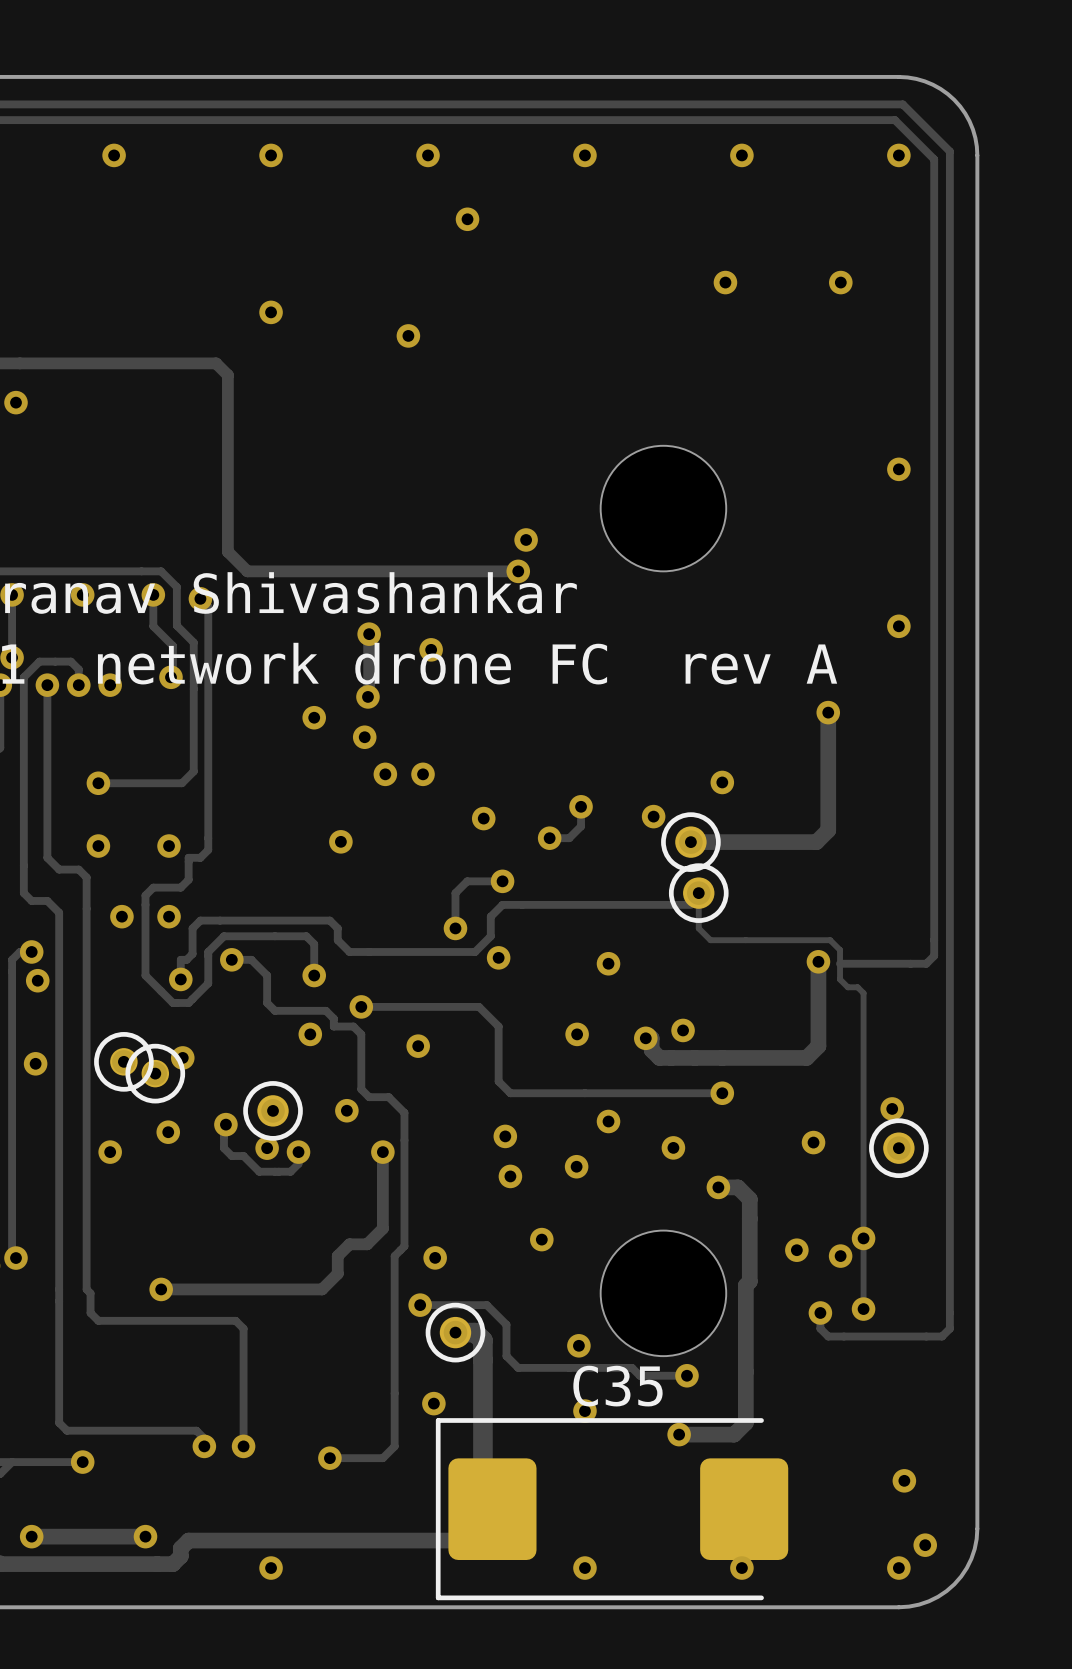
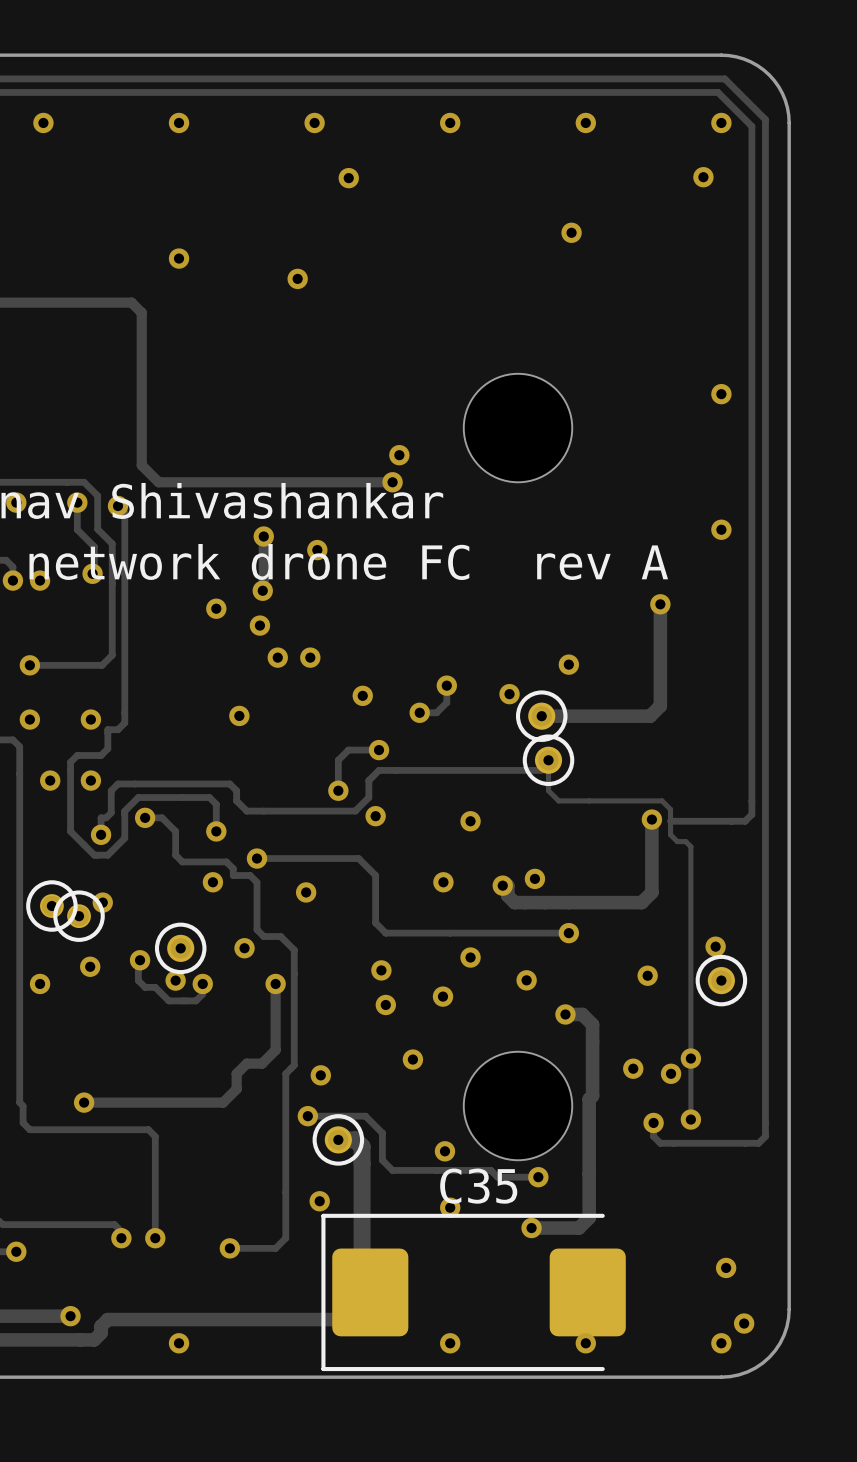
via position: (840, 282) -> (703, 177)

